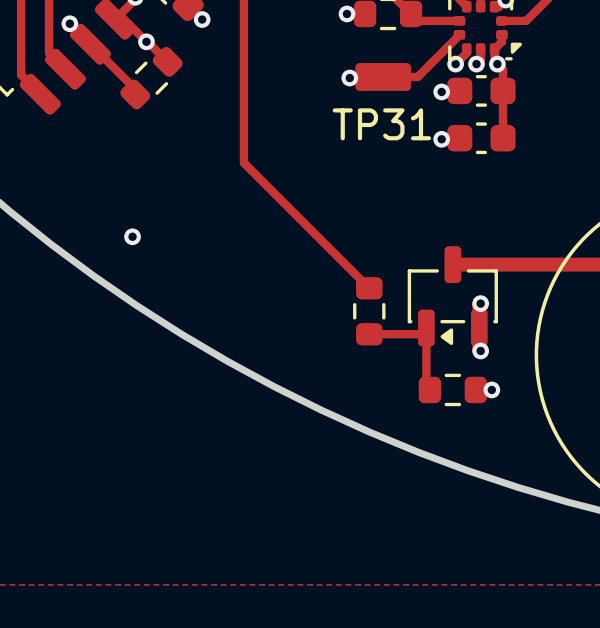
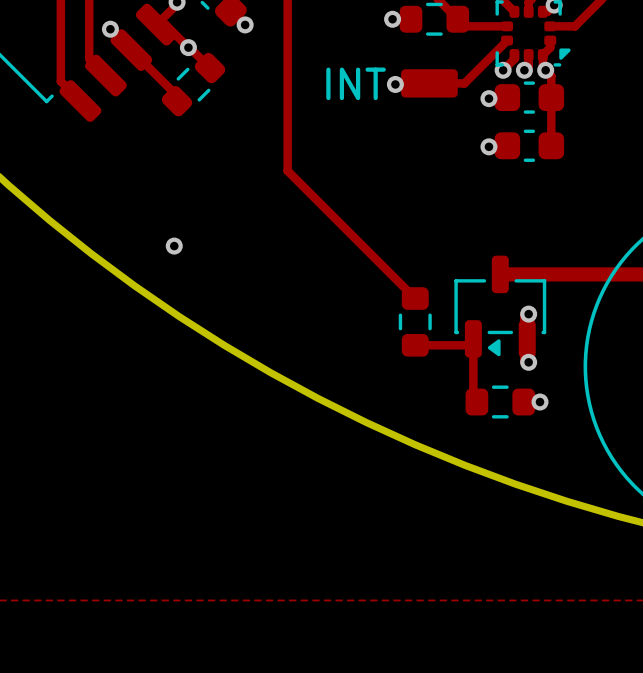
text: none -> INT (356, 83)
TP31 name: TP31 (381, 124) -> none

